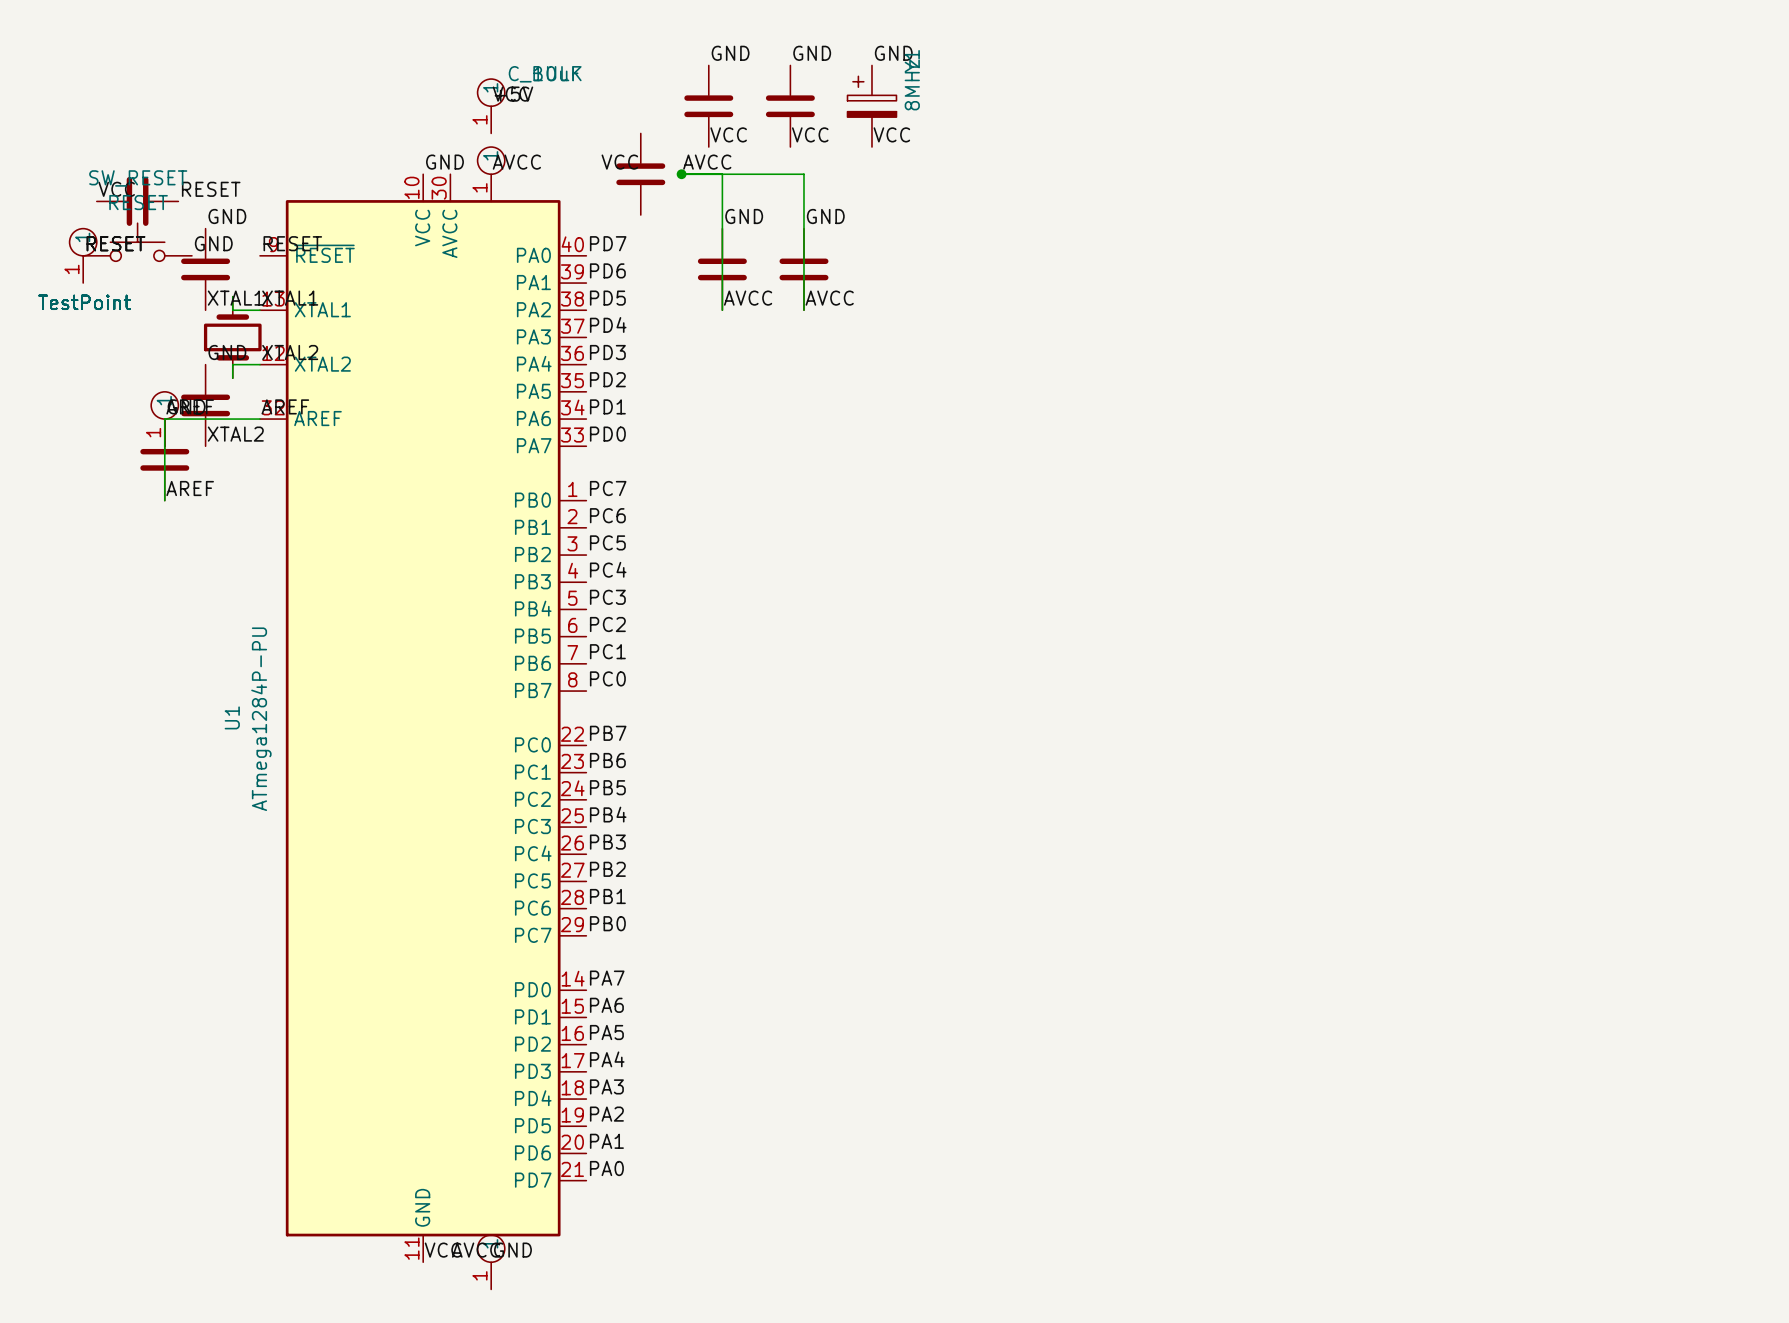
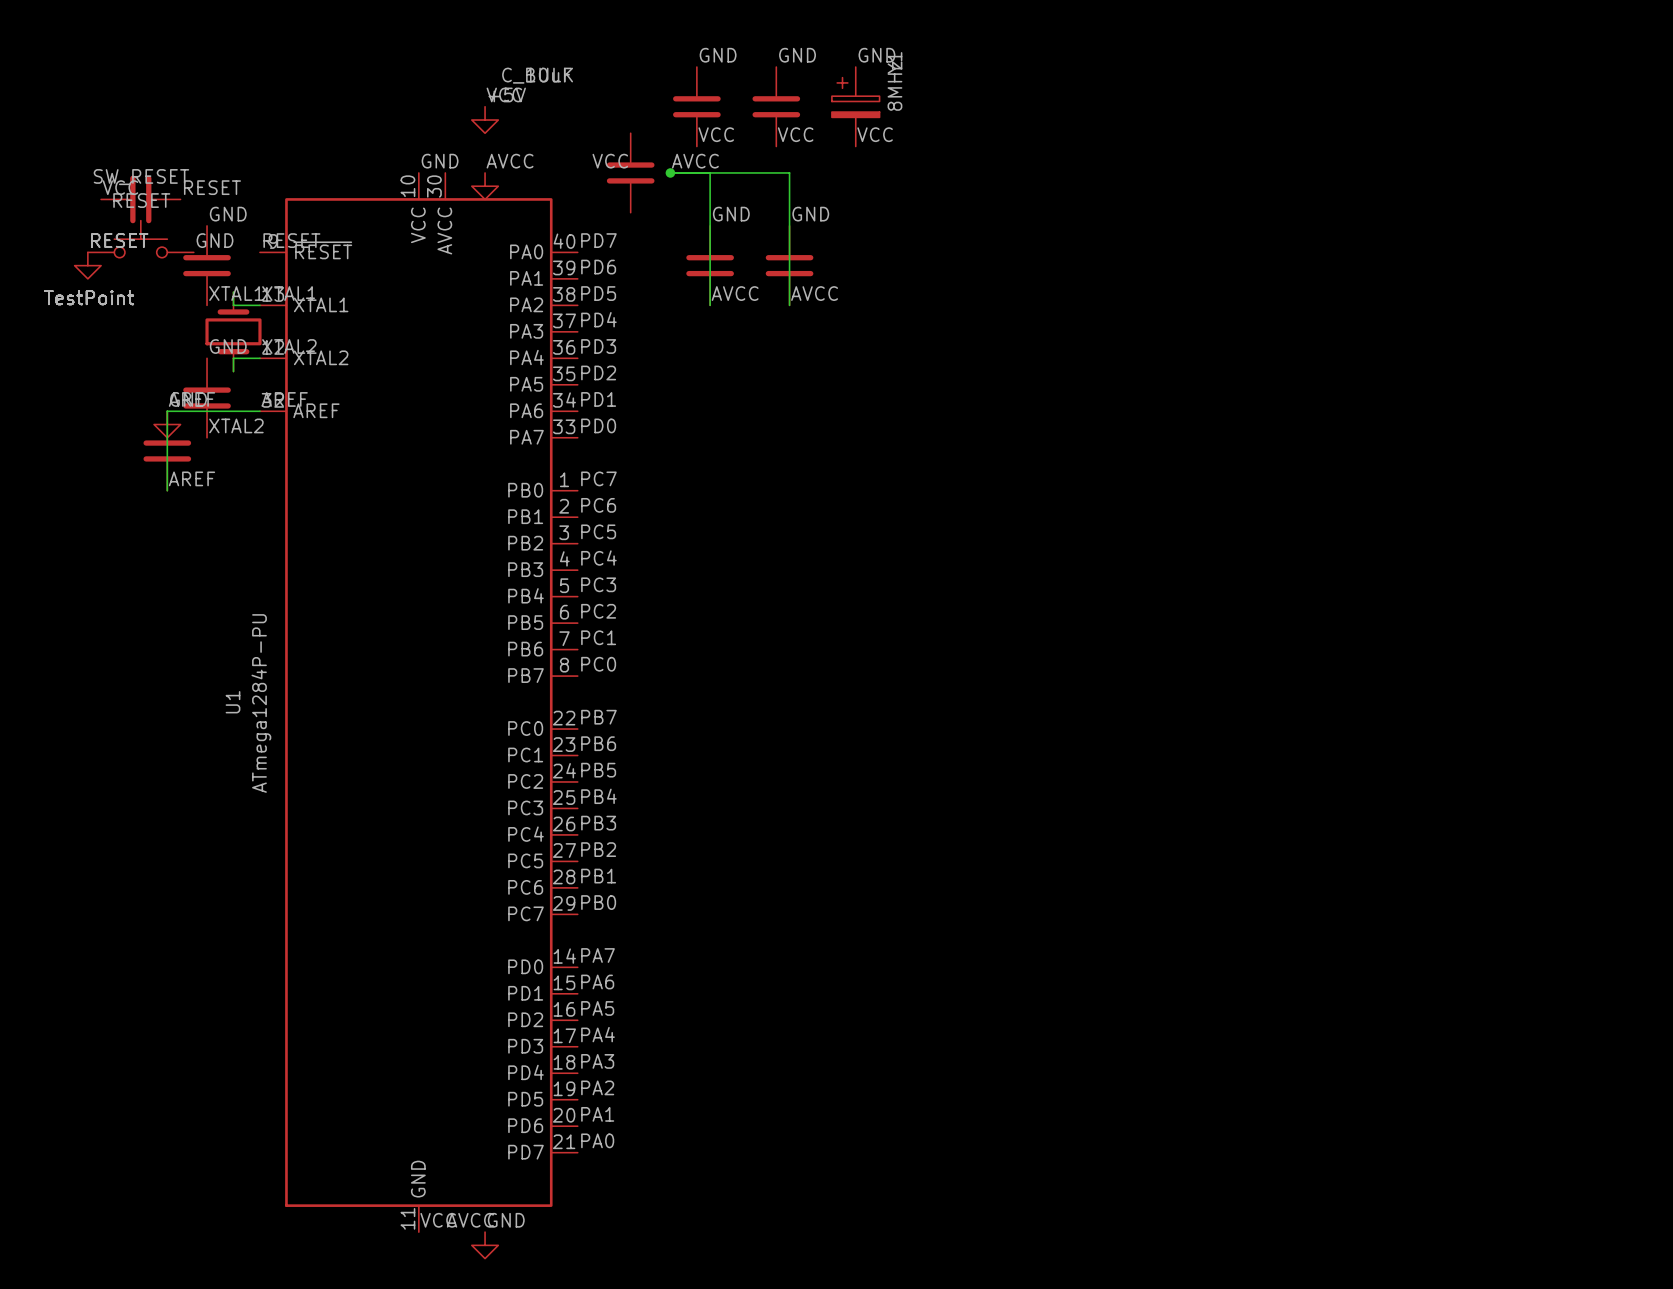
part: TestPoint (491, 106) -> none
part: none -> TestPoint (485, 120)
part: TestPoint (491, 174) -> none
part: none -> TestPoint (485, 186)
part: TestPoint (83, 255) -> none
part: none -> TestPoint (87, 265)
part: TestPoint (164, 419) -> none
part: none -> TestPoint (167, 424)
part: TestPoint (491, 1262) -> none
part: none -> TestPoint (485, 1245)

